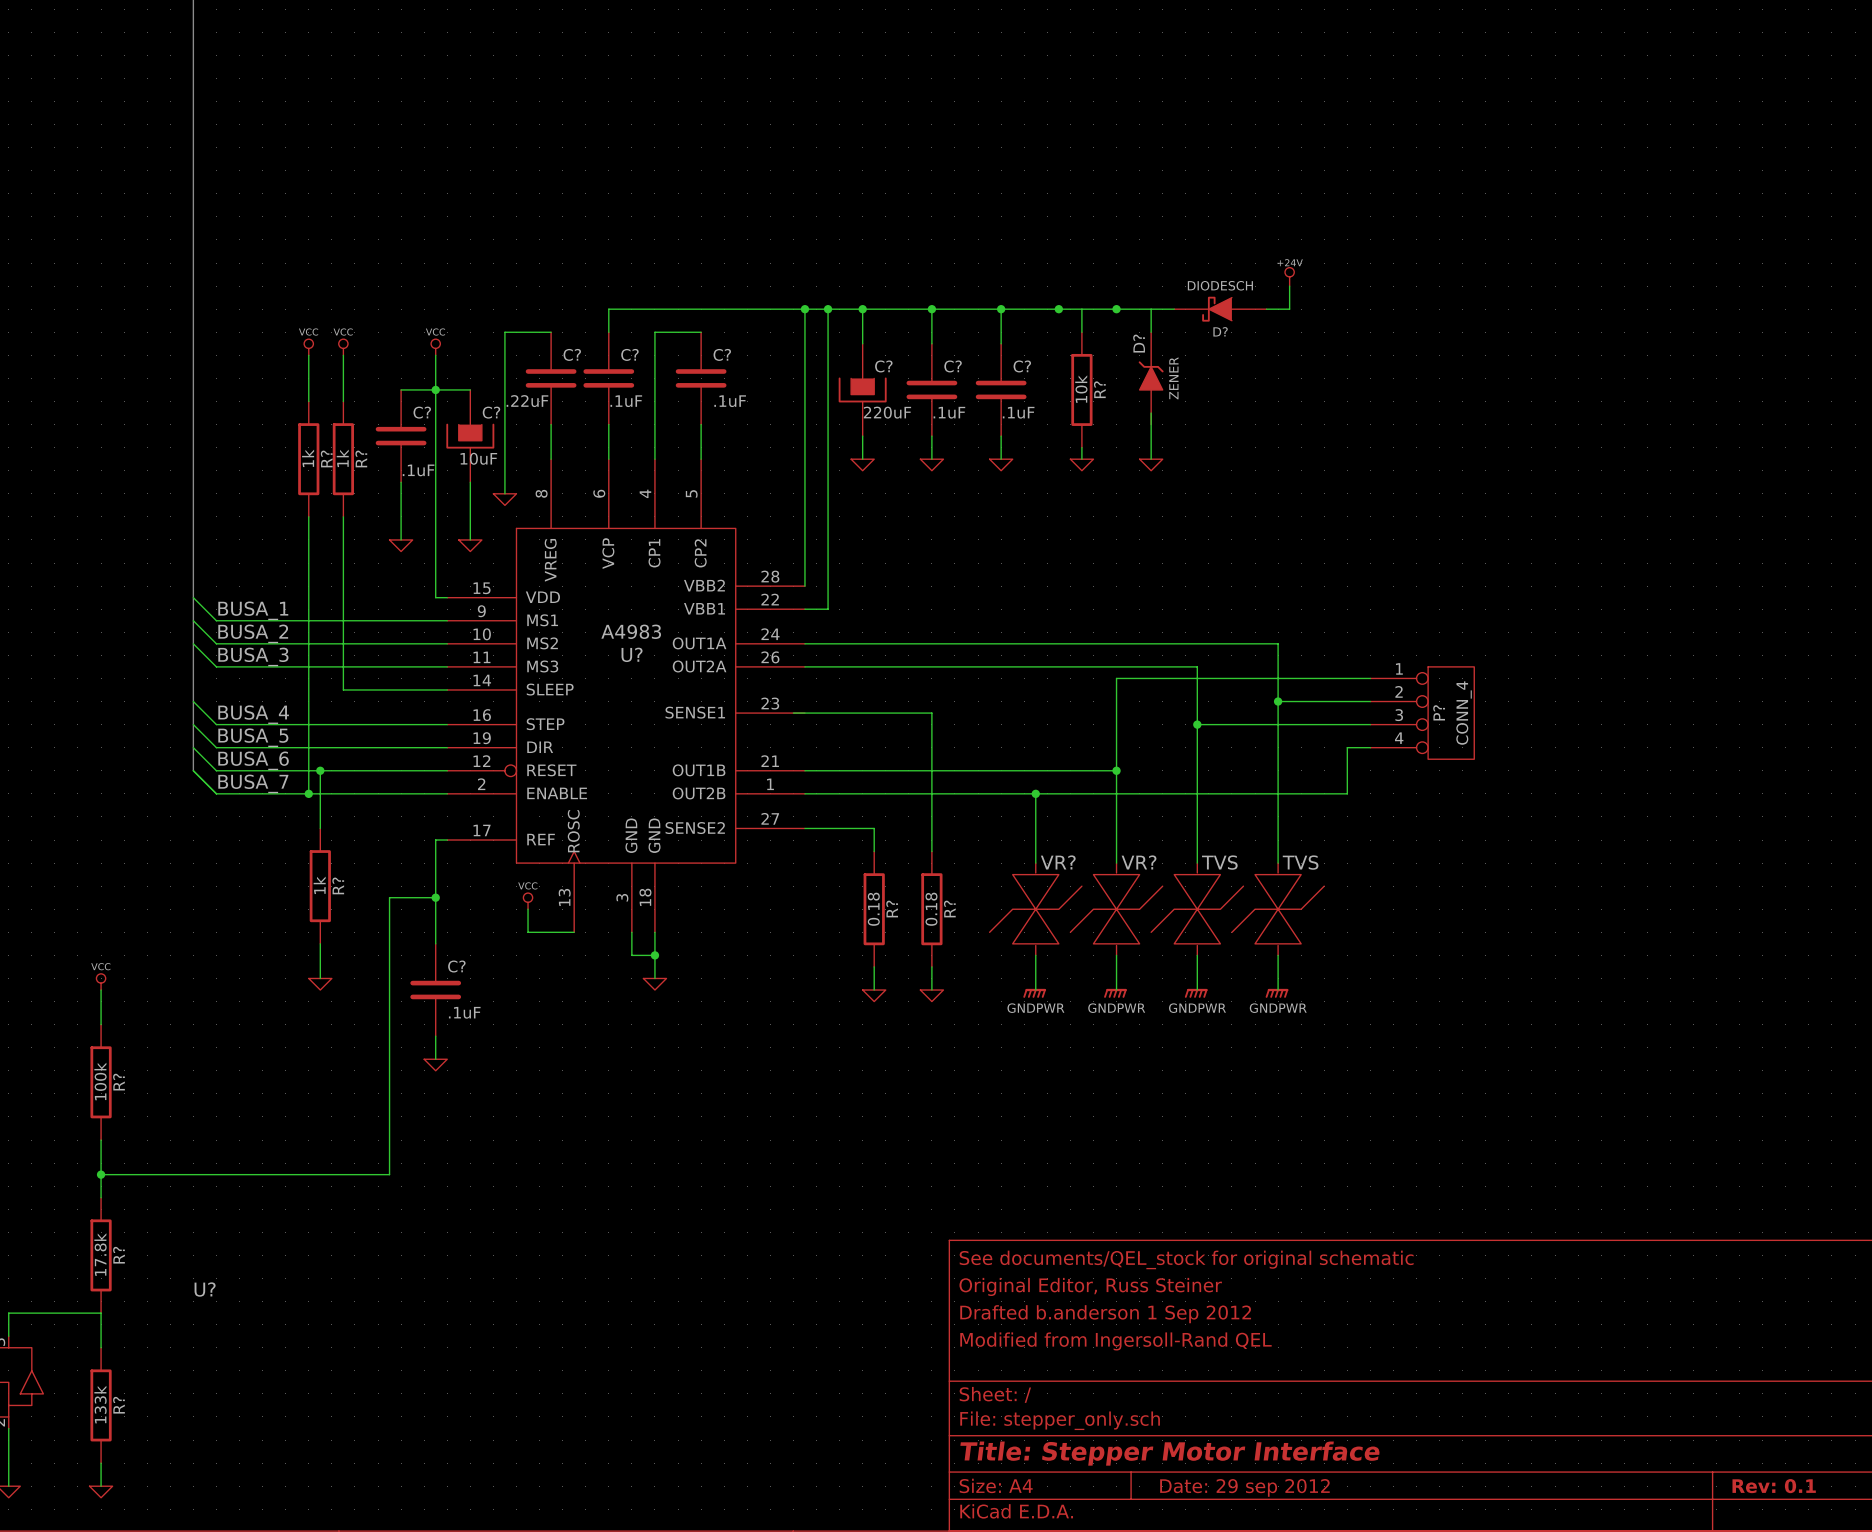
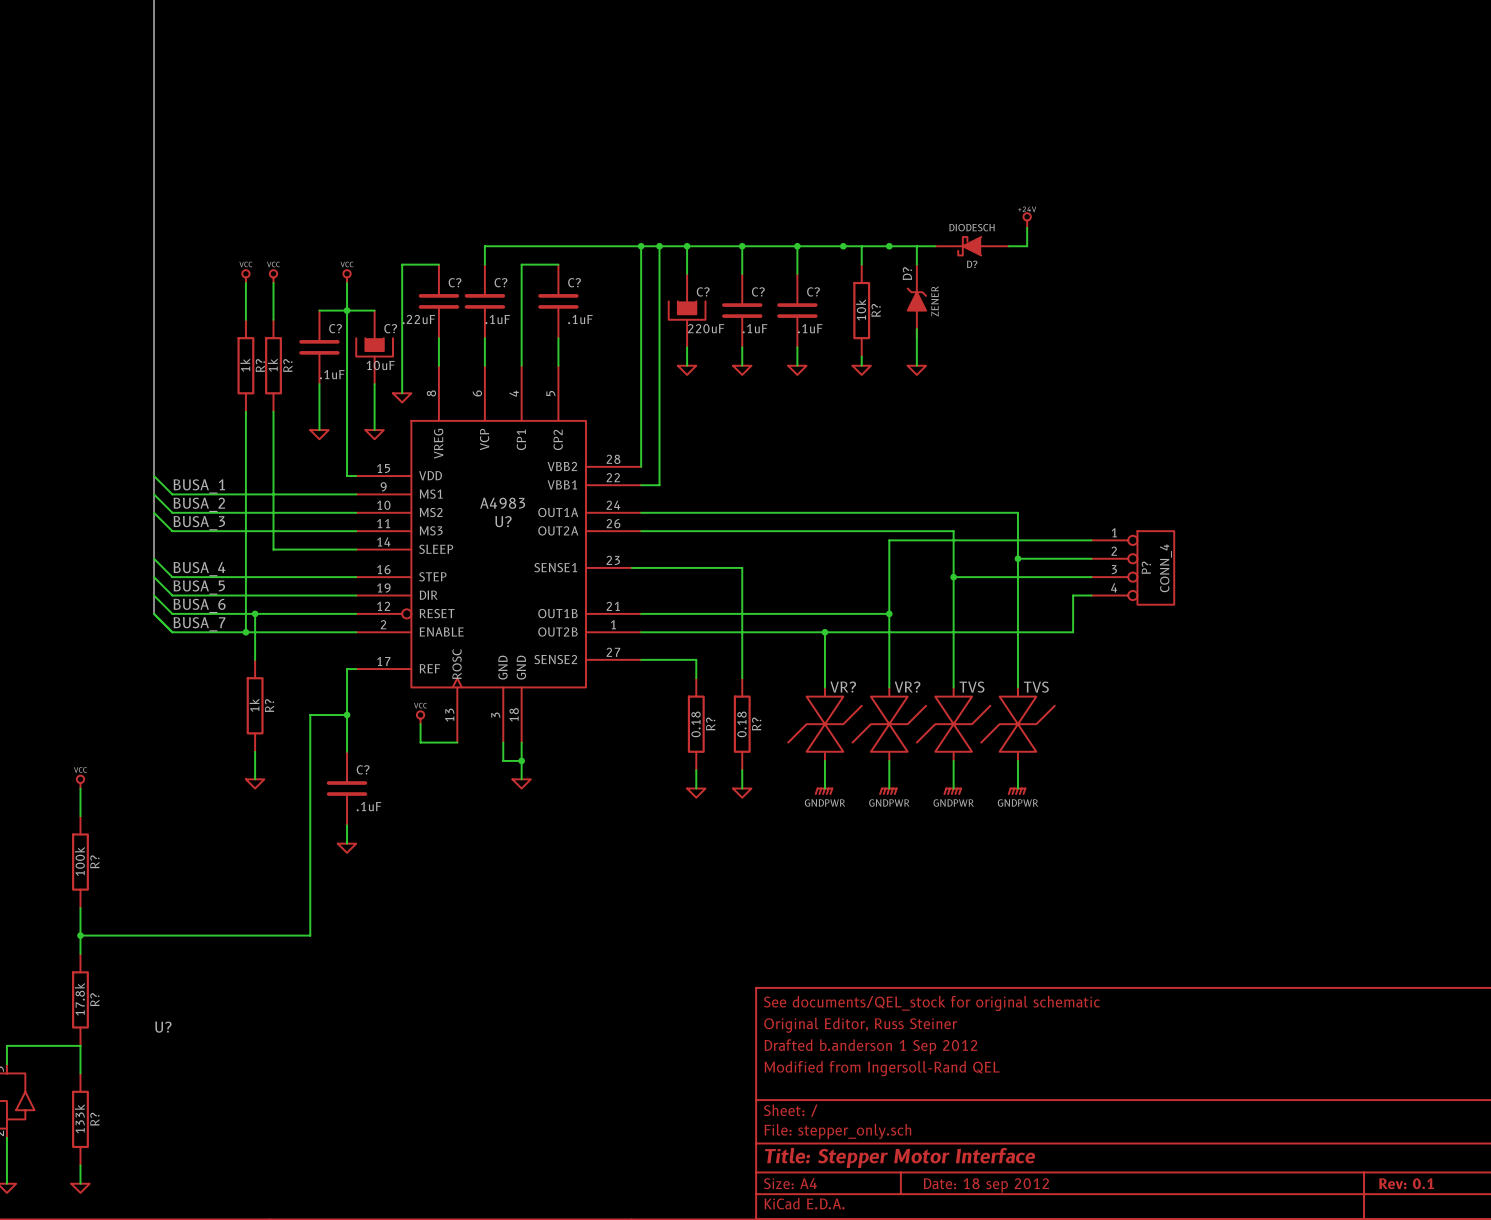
title block: Date: 29 sep 2012 (1244, 1487) -> Date: 18 sep 2012 (986, 1185)

